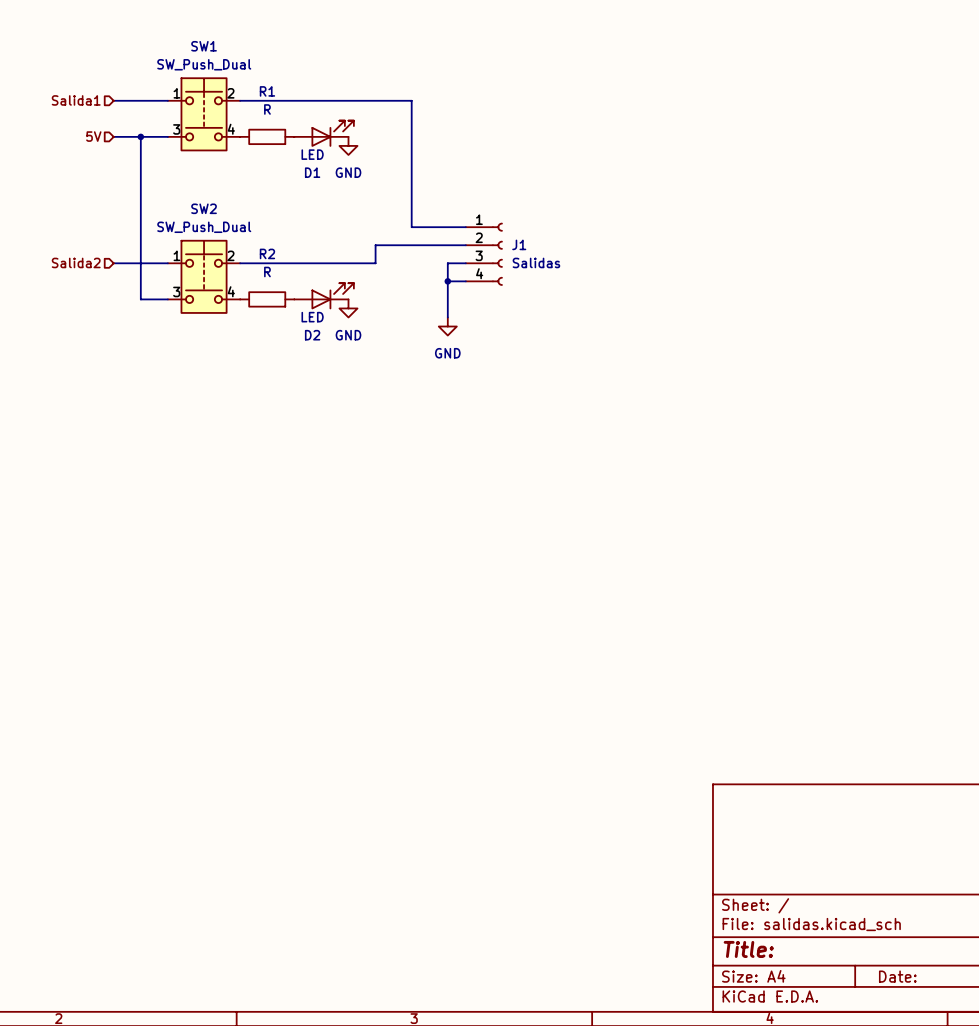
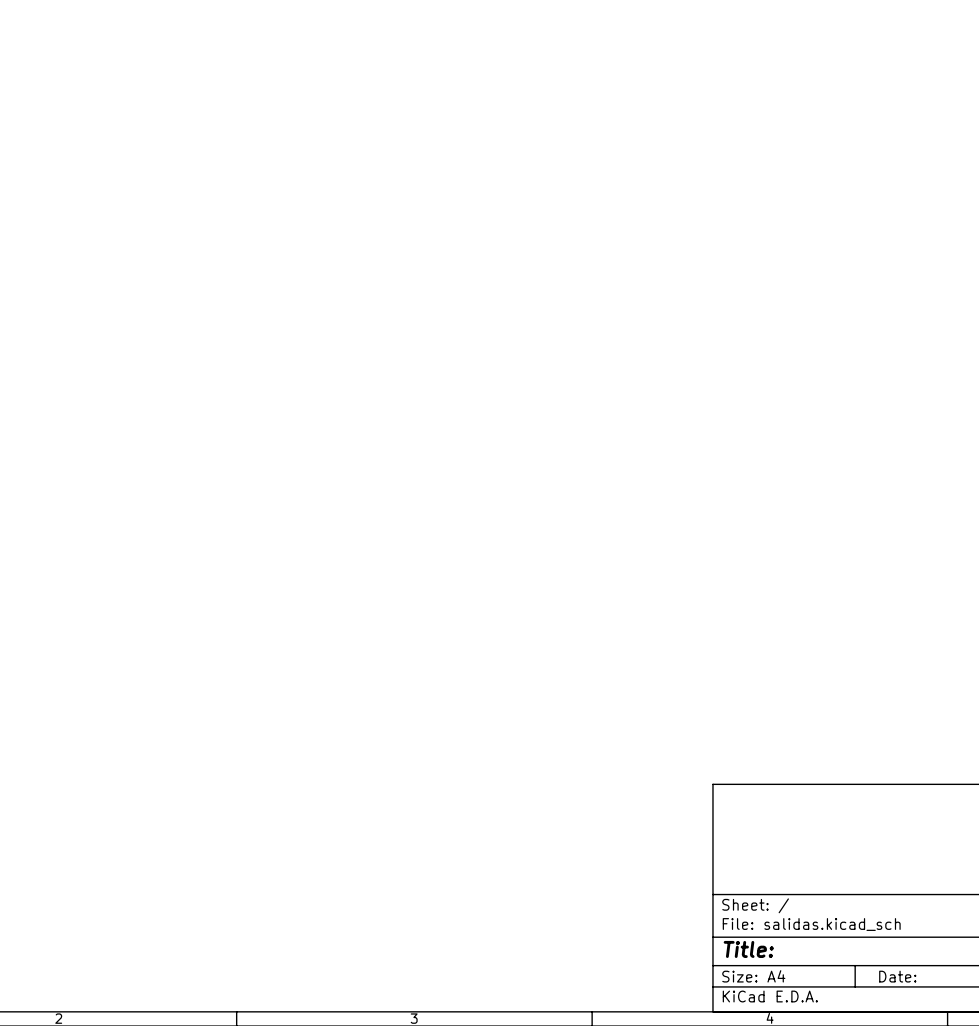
hierarchical label: Salida1 (76, 100) -> none
wire: (113, 100) (167, 100) -> none
wire: (240, 100) (411, 100) (411, 227) (465, 227) -> none
SW1: SW_Push_Dual (204, 114) -> none
D1: LED (324, 133) -> none
hierarchical label: 5V (93, 136) -> none
wire: (113, 136) (167, 136) -> none
wire: (140, 136) (140, 299) (167, 299) -> none
junction: (140, 136) -> none
R1: R (267, 136) -> none
power symbol: GND (348, 145) -> none
wire: (465, 245) (375, 245) (375, 263) (240, 263) -> none
J1: Salidas (484, 254) -> none
hierarchical label: Salida2 (76, 262) -> none
wire: (113, 263) (167, 263) -> none
wire: (465, 263) (447, 263) (447, 317) -> none
SW2: SW_Push_Dual (204, 276) -> none
wire: (447, 281) (465, 281) -> none
junction: (447, 281) -> none
D2: LED (324, 296) -> none
R2: R (267, 299) -> none
power symbol: GND (348, 308) -> none
power symbol: GND (447, 326) -> none

